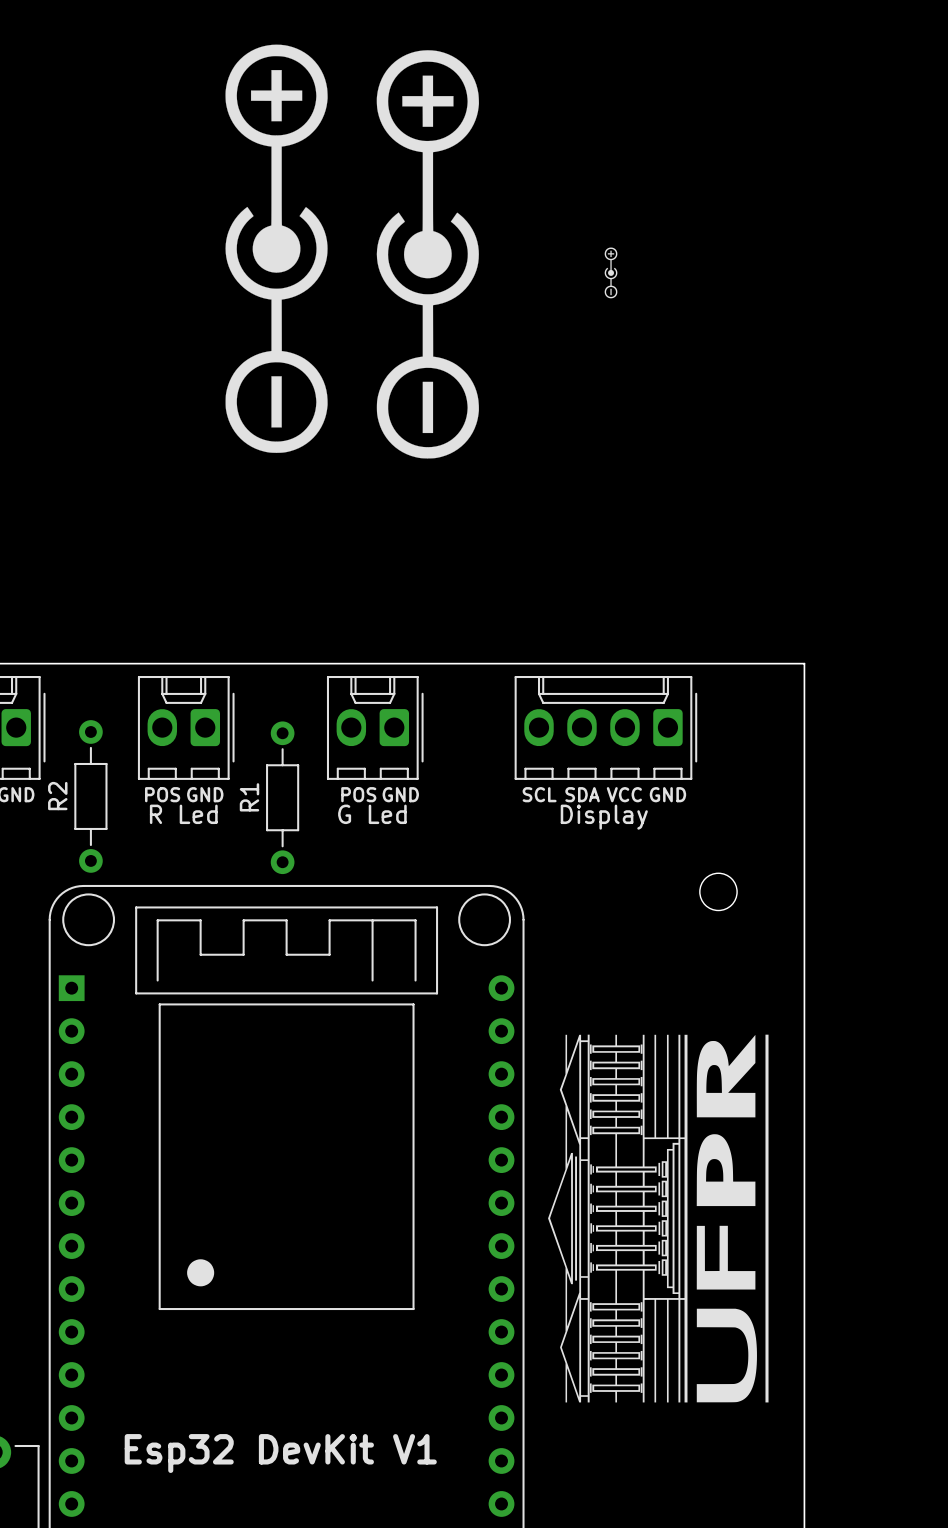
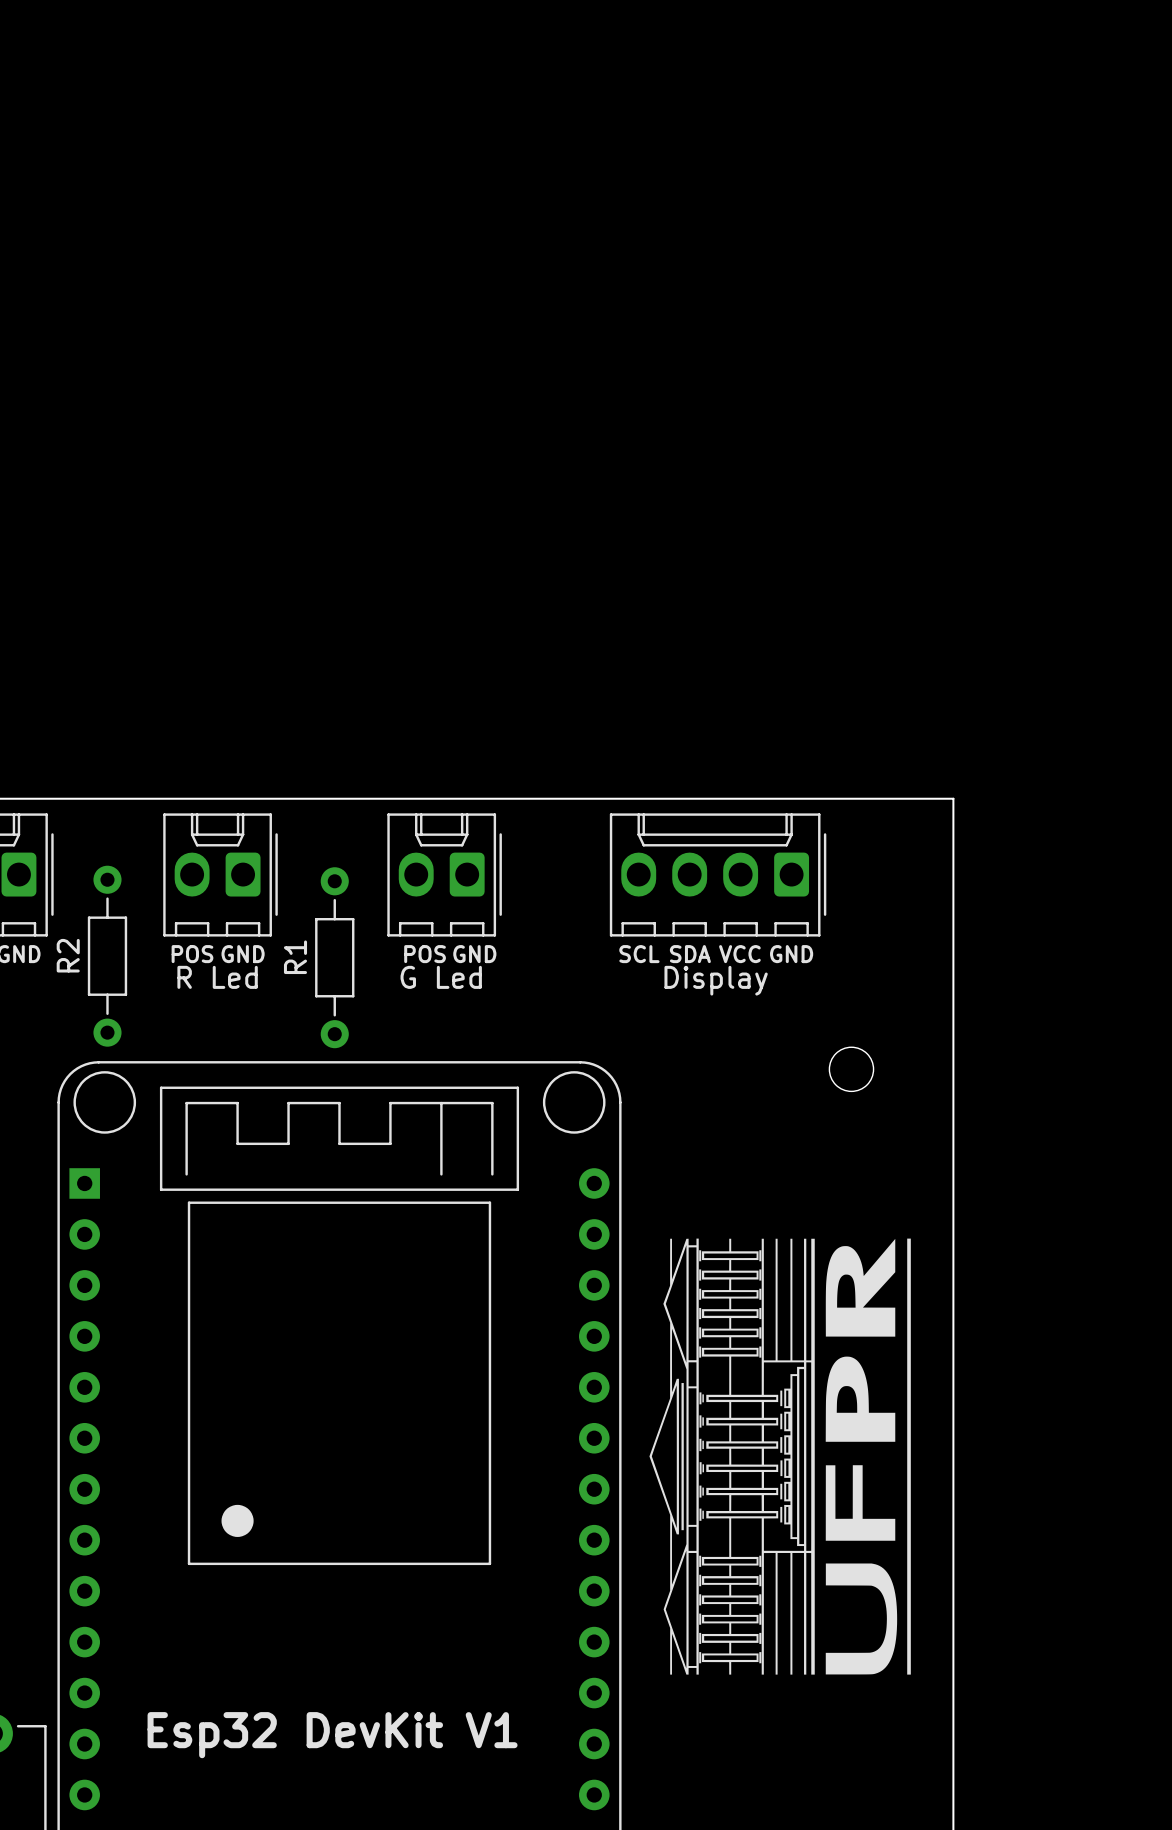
drawing: [225, 44, 328, 453] -> none
drawing: [376, 50, 479, 459] -> none
drawing: [604, 247, 618, 299] -> none

